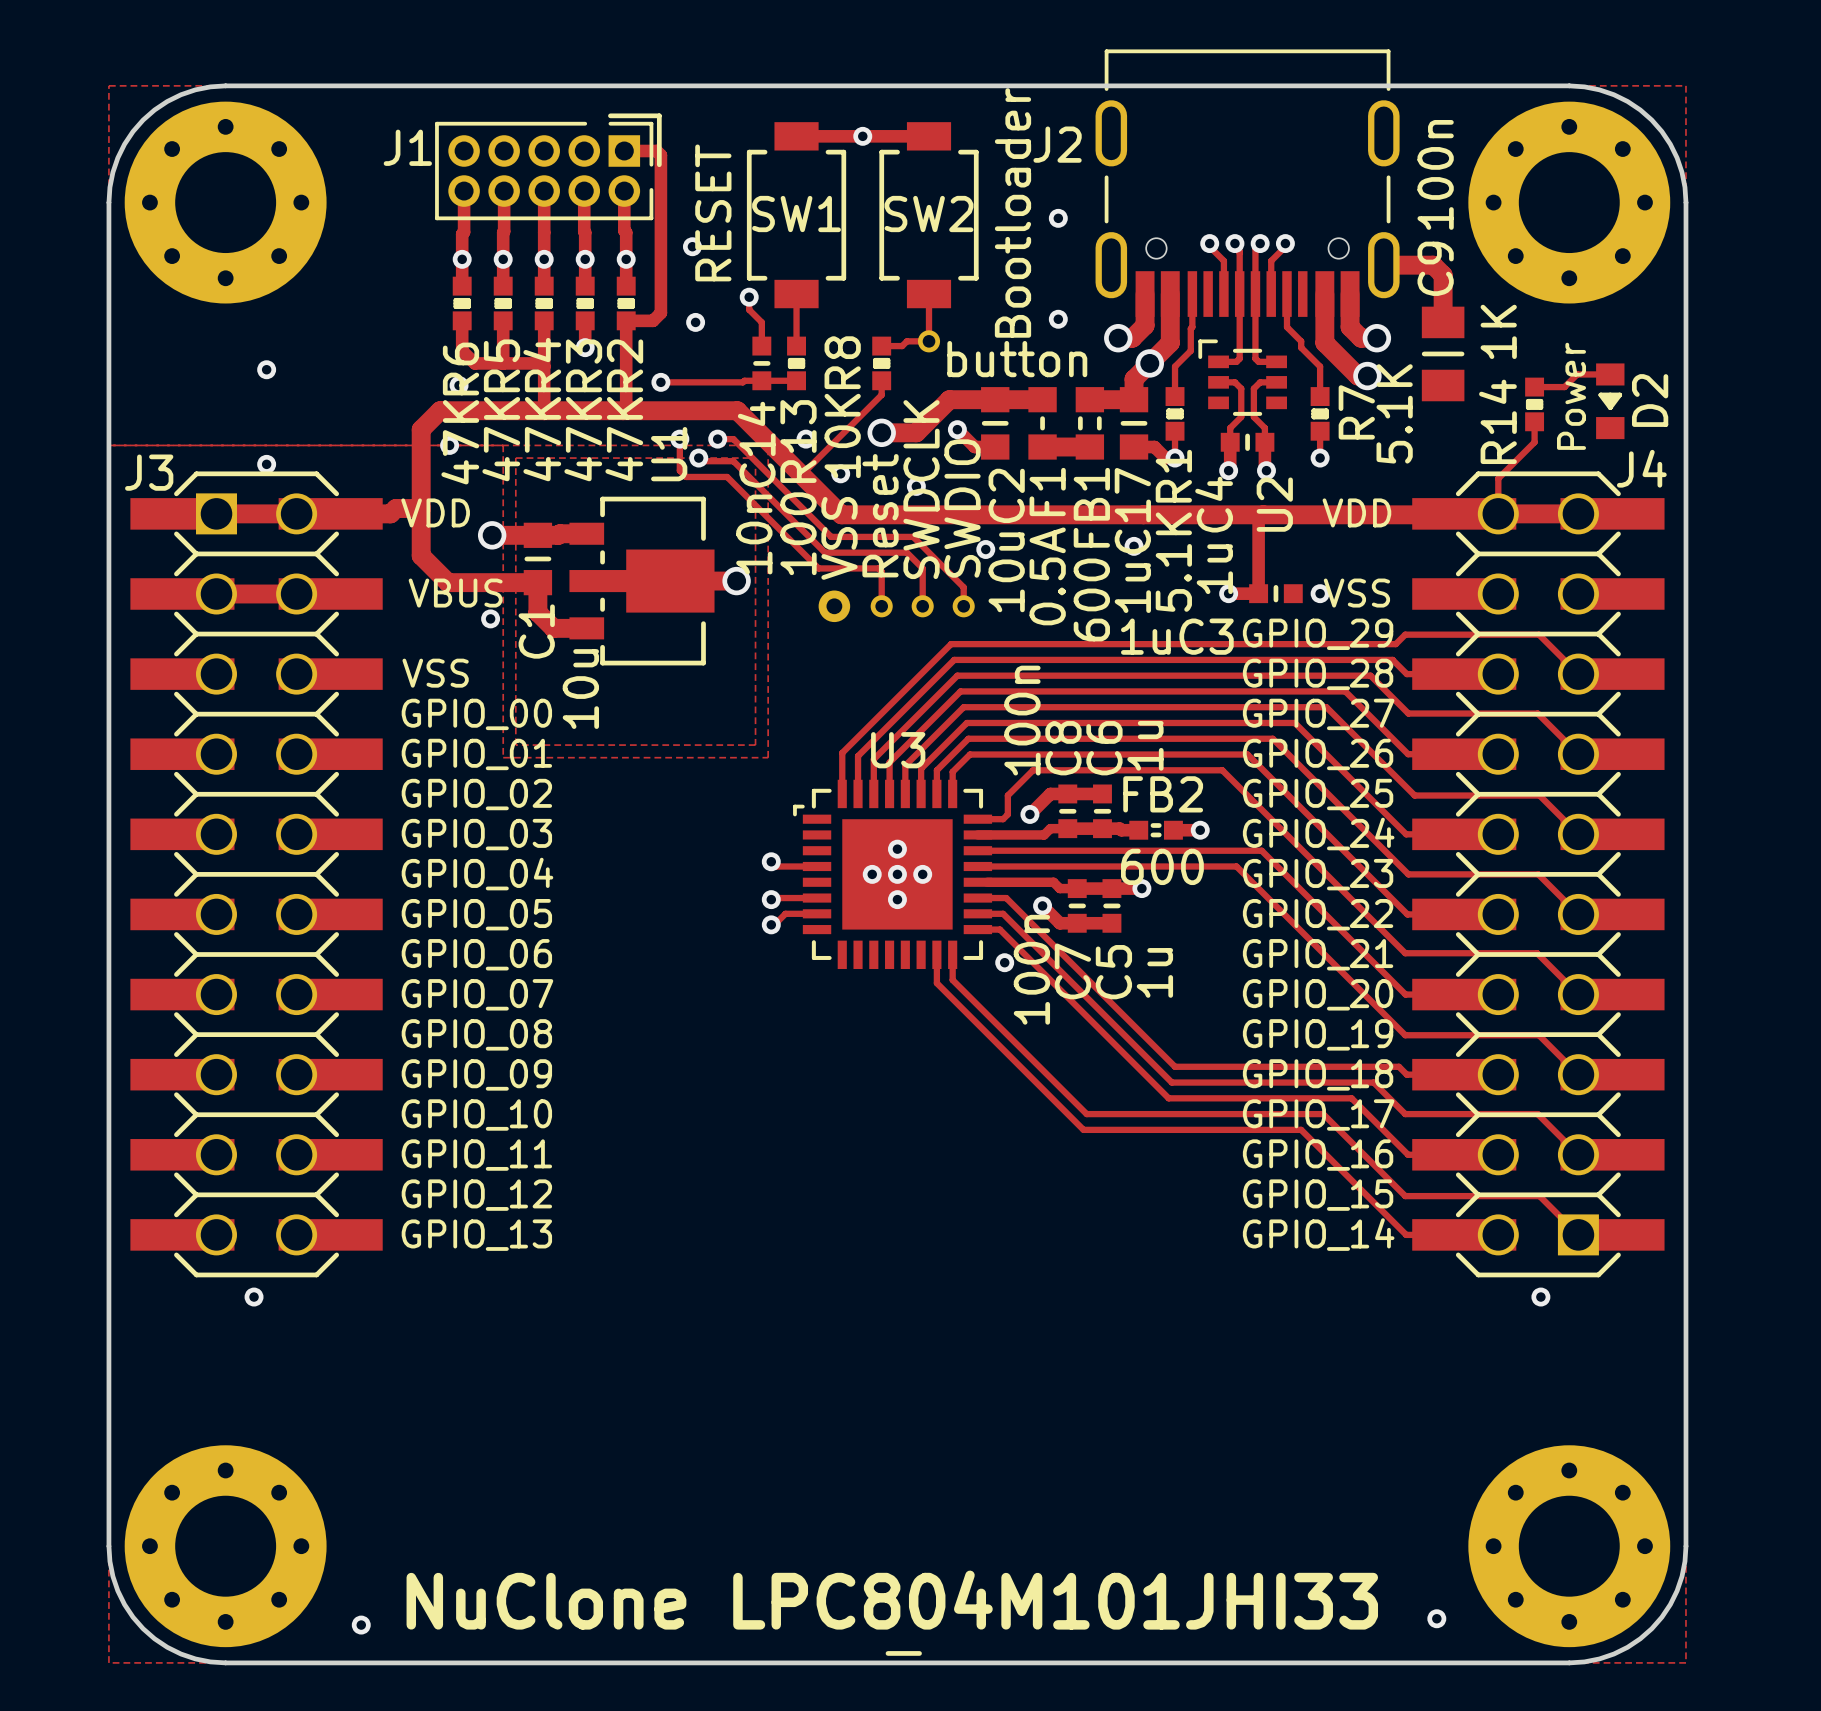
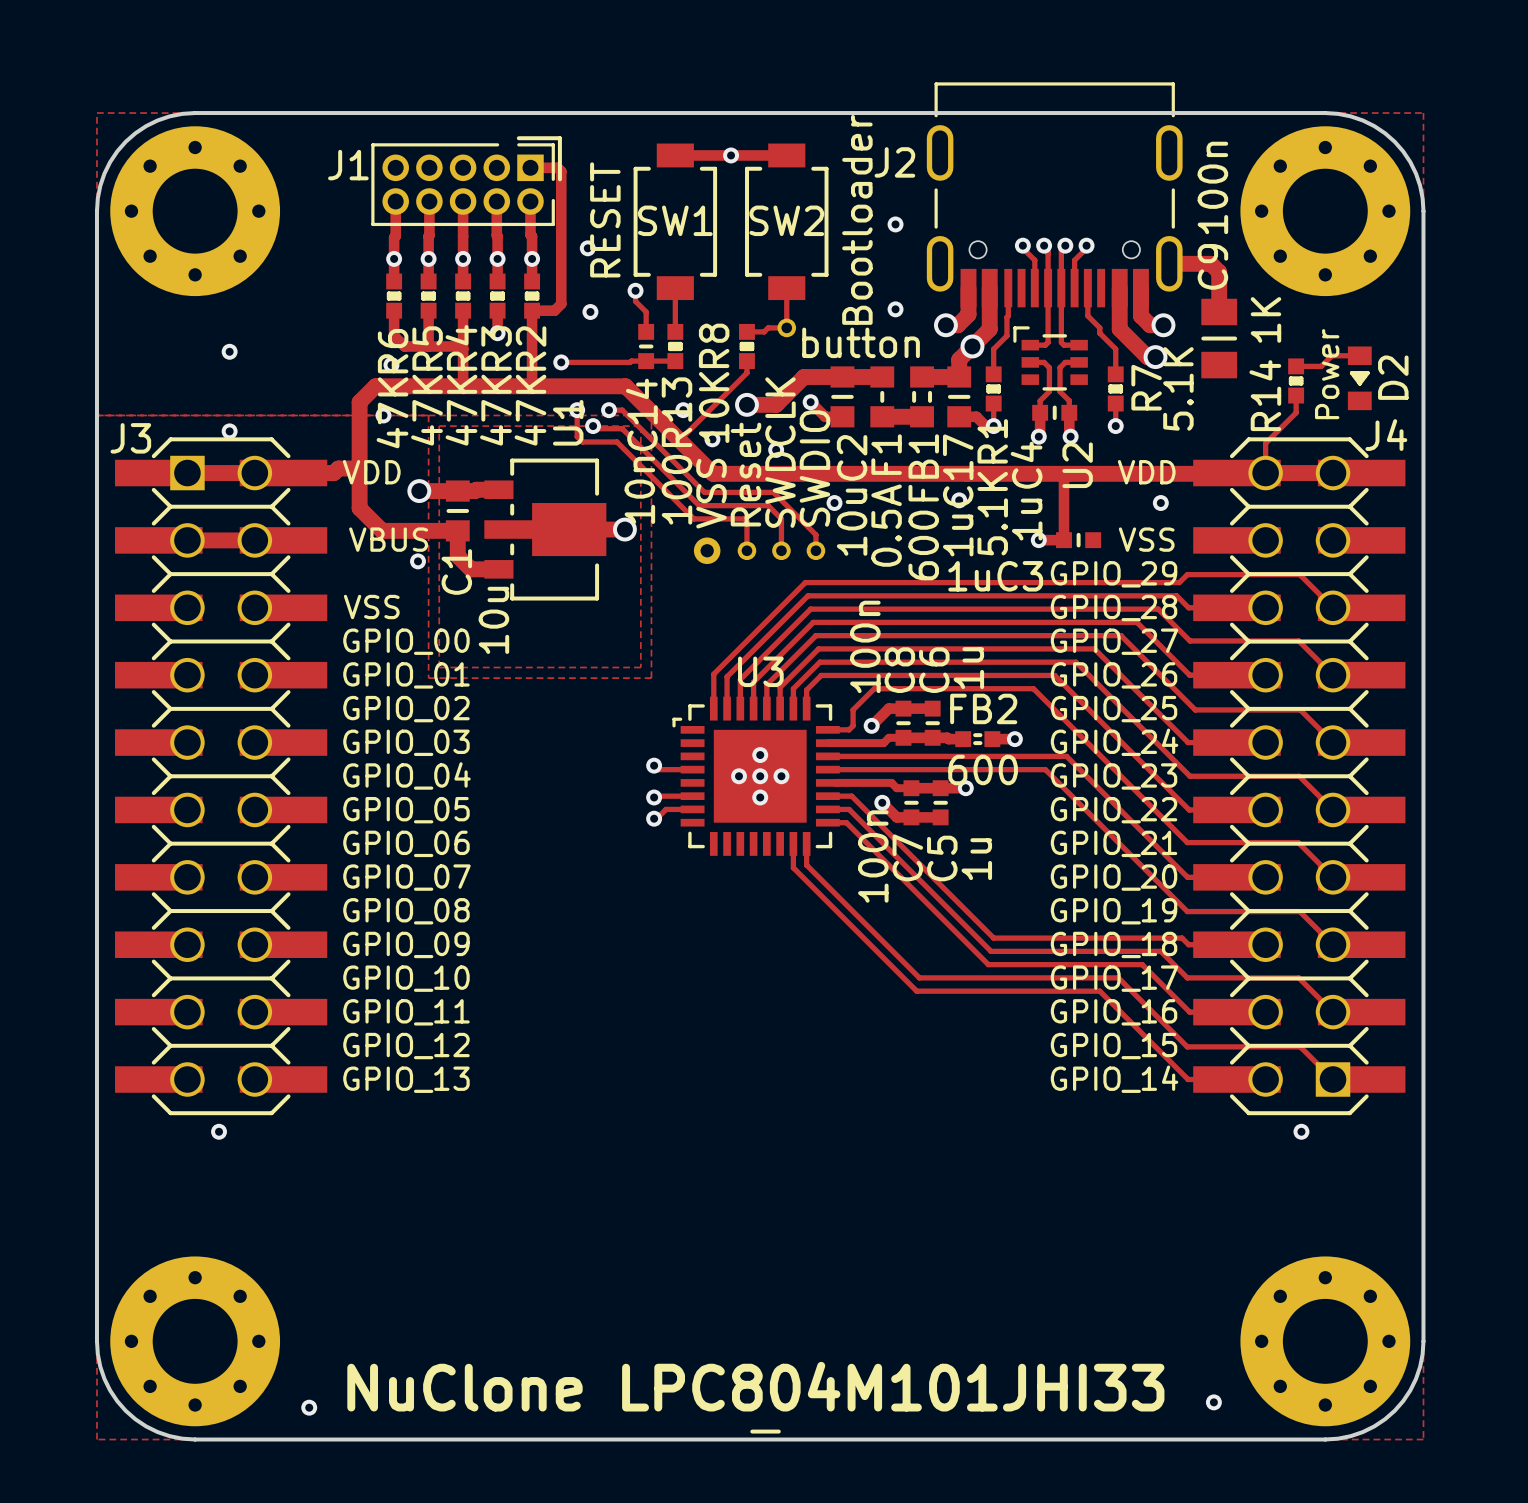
via position: (1320, 593) -> (1160, 503)
via: (1004, 962) -> none

